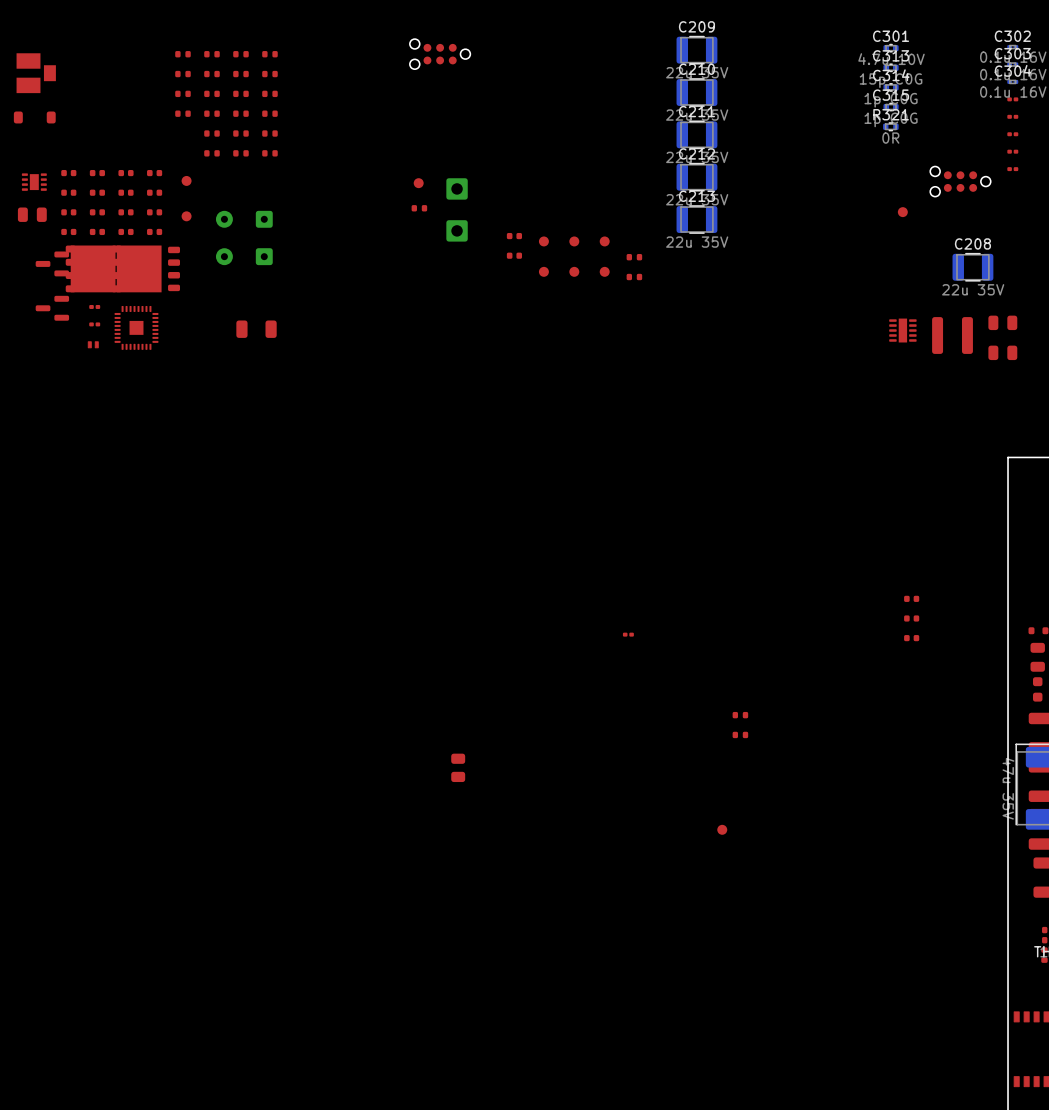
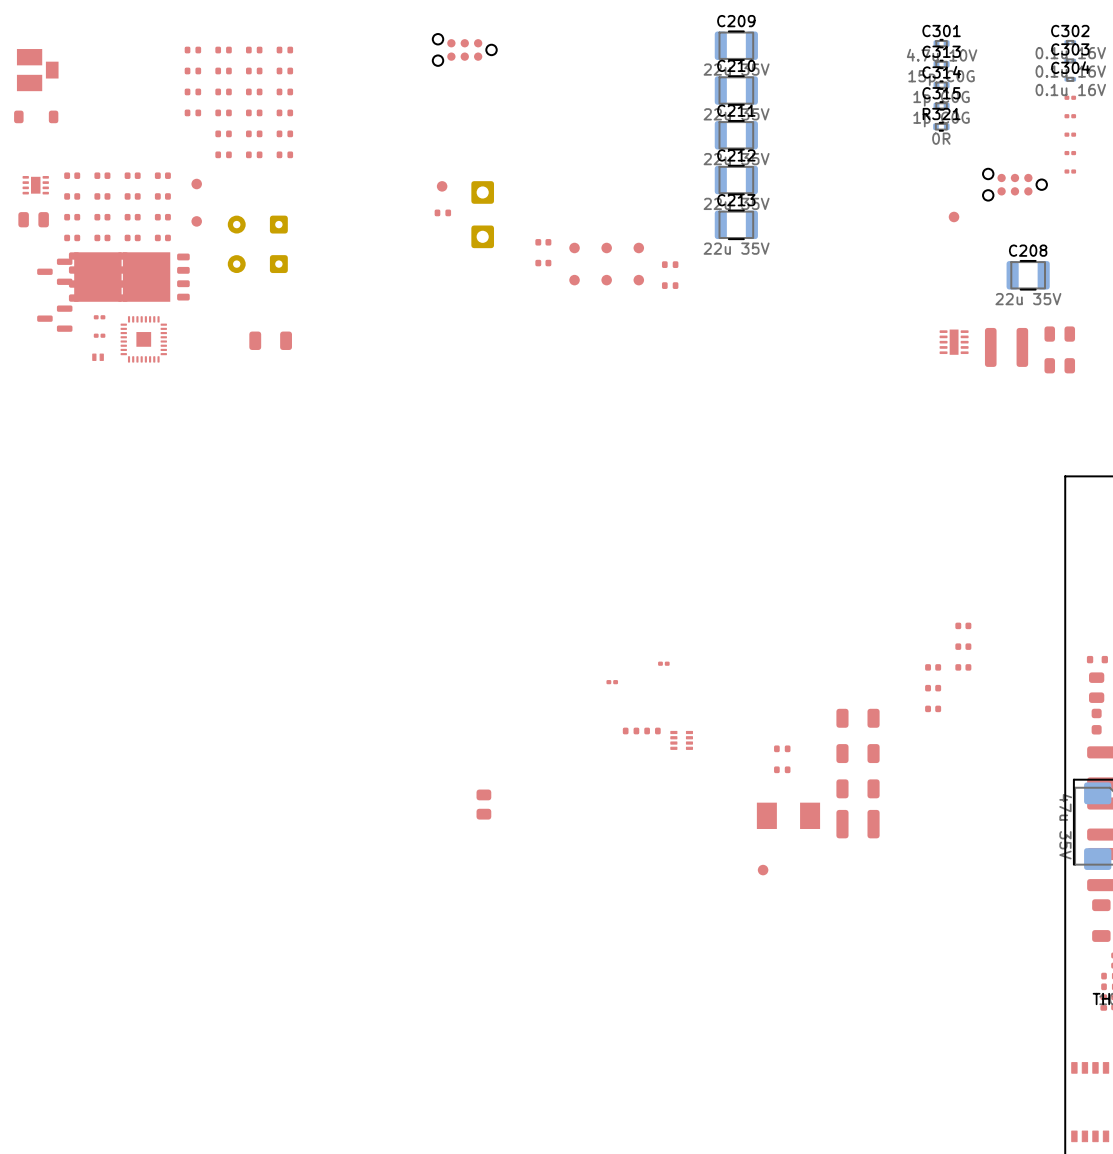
part: none -> (933, 667)
part: none -> (612, 682)
part: none -> (933, 688)
part: none -> (933, 708)
part: none -> (858, 718)
part: none -> (631, 730)
part: none -> (652, 730)
part: none -> (681, 740)
part: none -> (858, 753)
part: none -> (858, 788)
part: none -> (788, 815)
part: none -> (858, 824)

